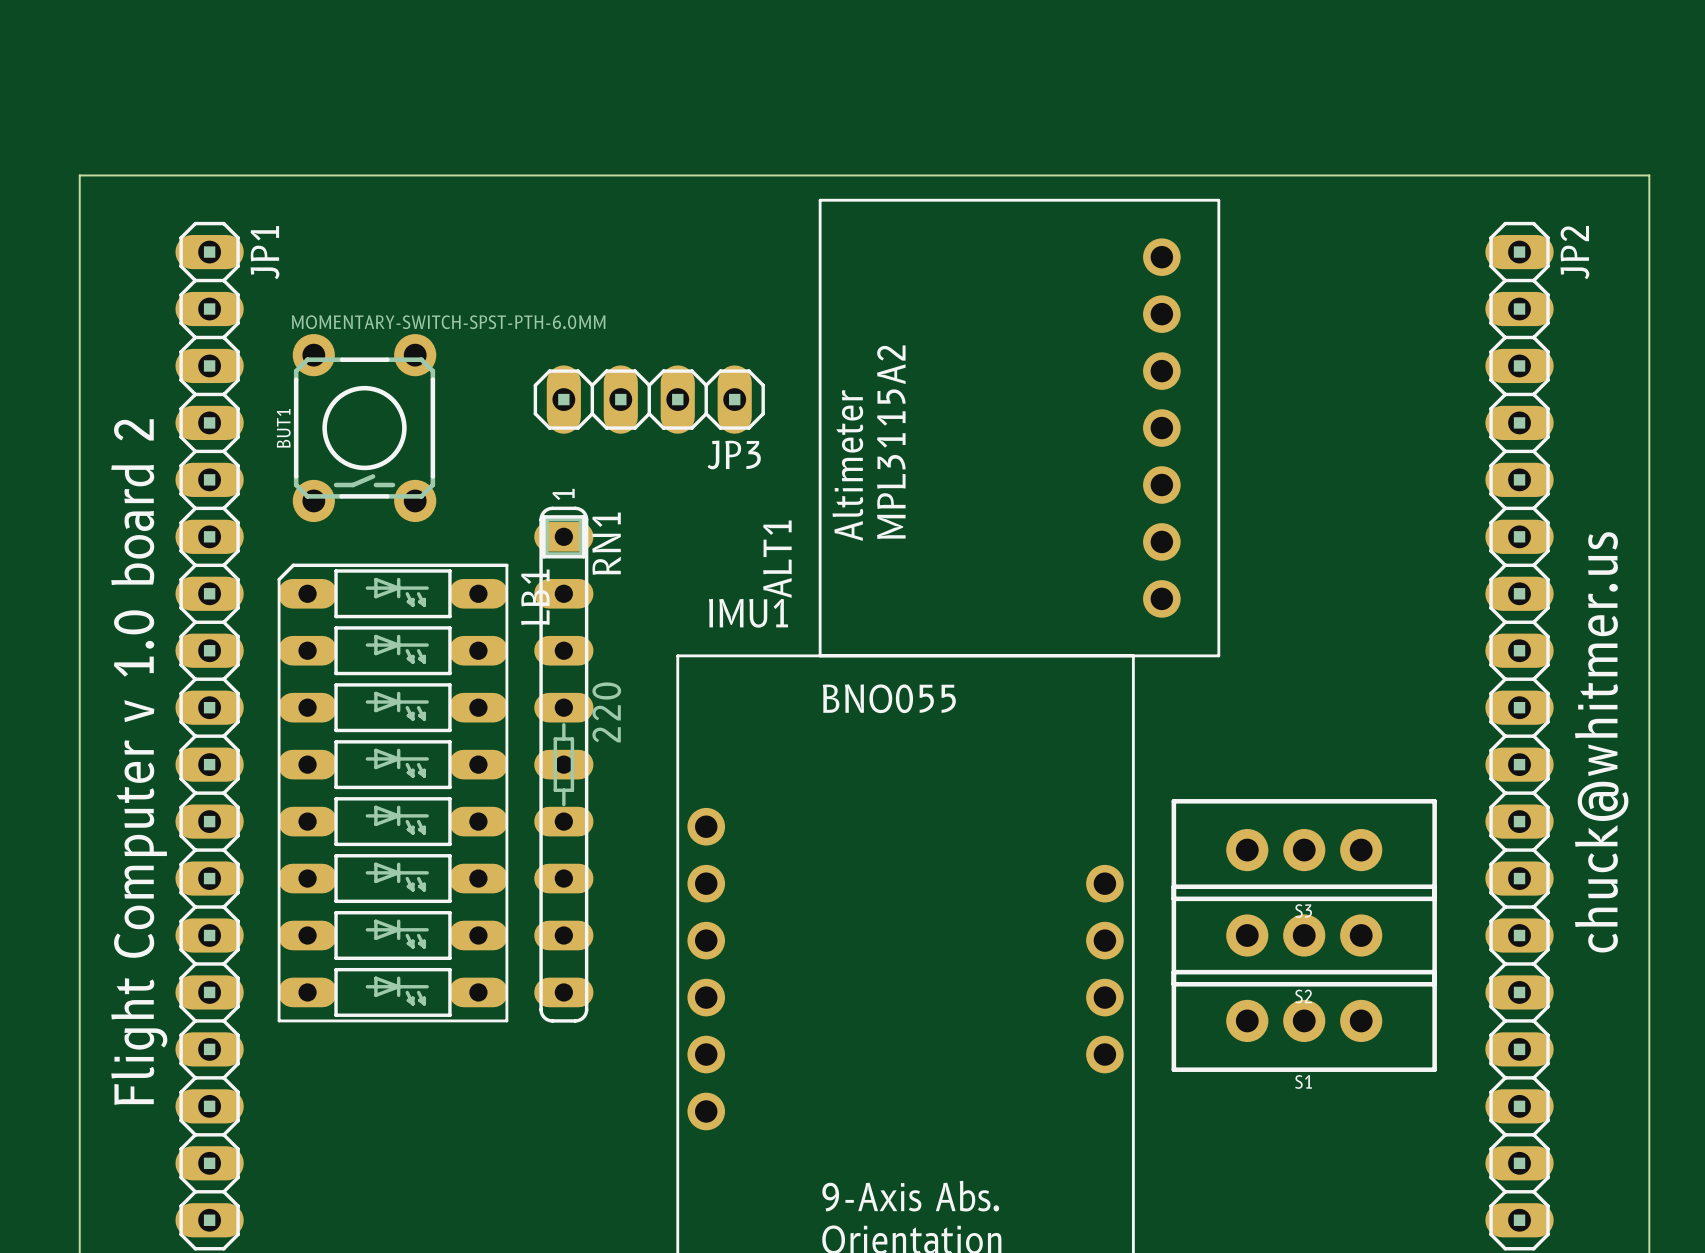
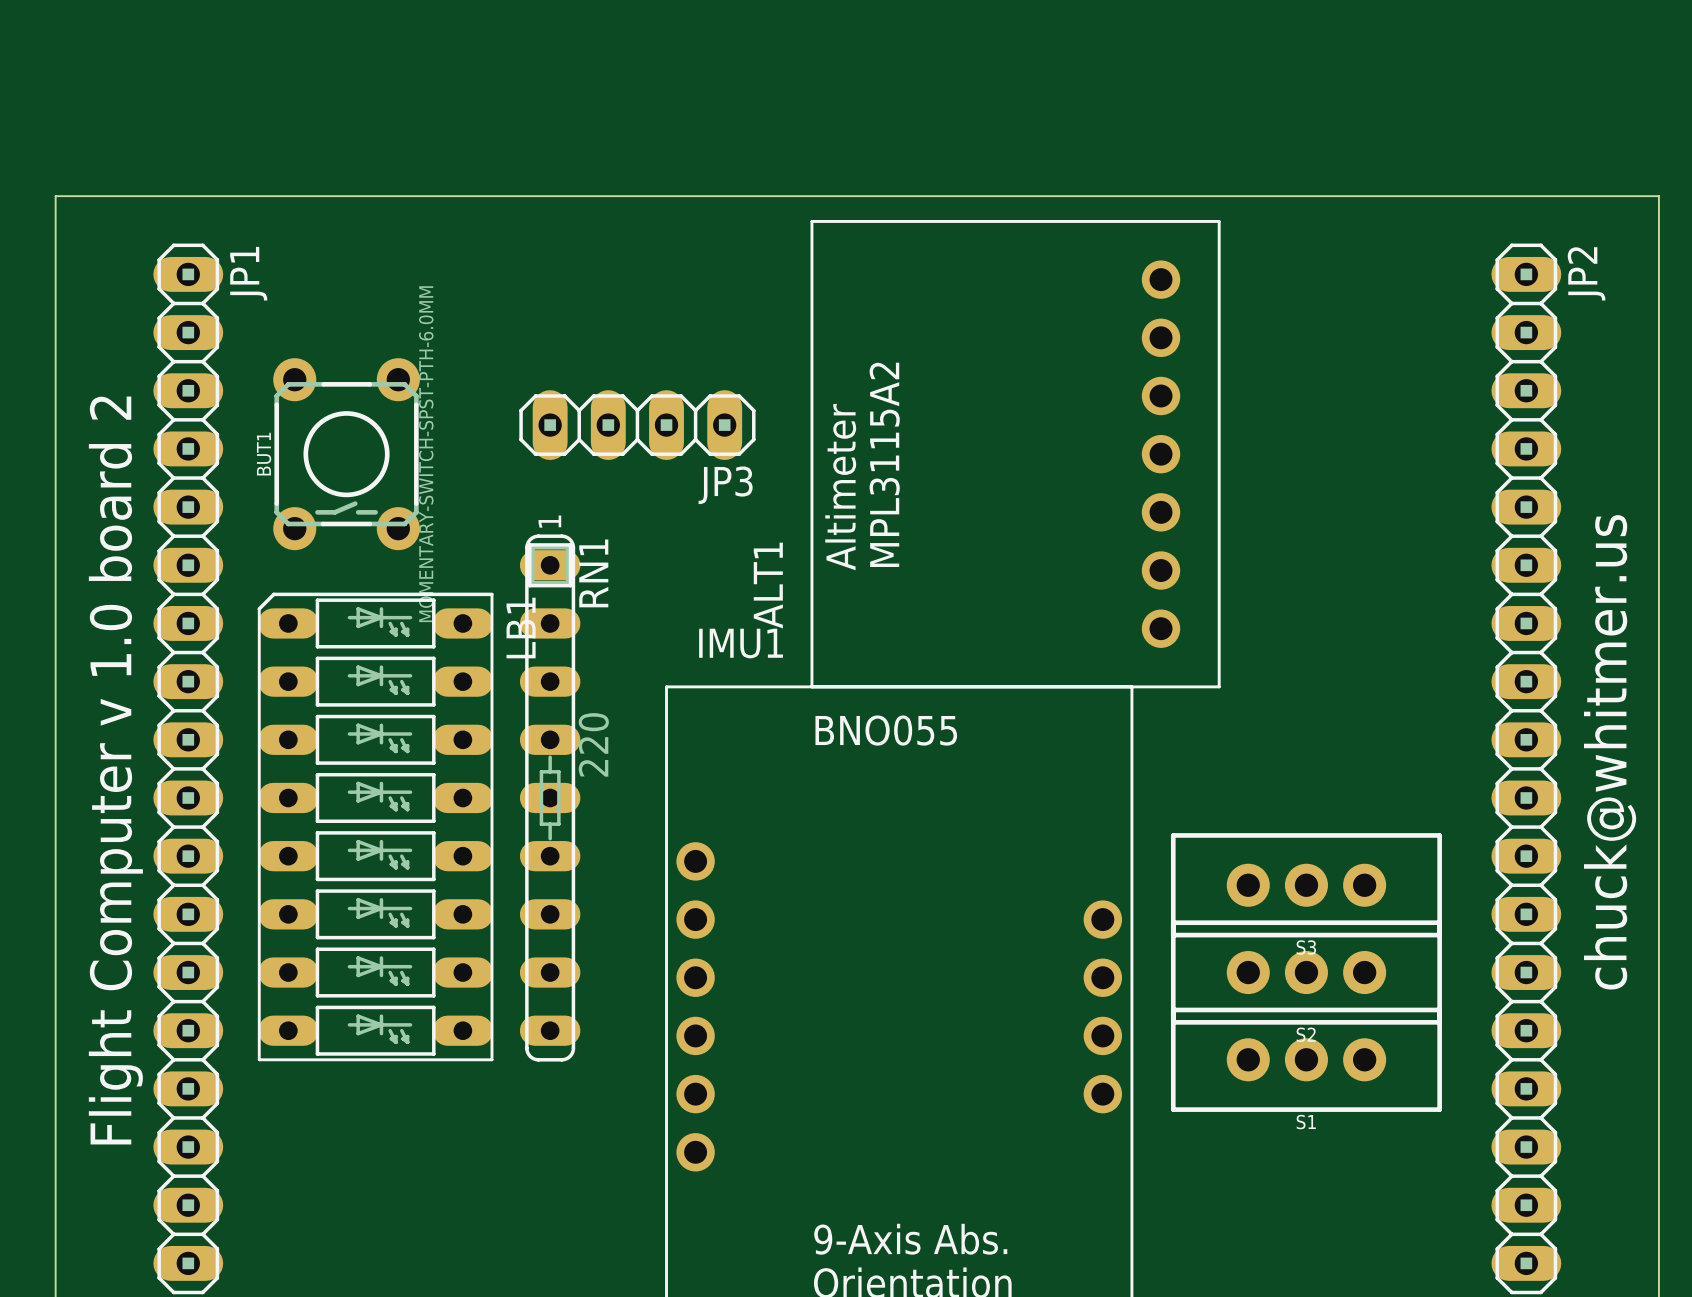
BUT1 value rotation: 0° (448, 322) -> 90° counterclockwise (426, 454)

